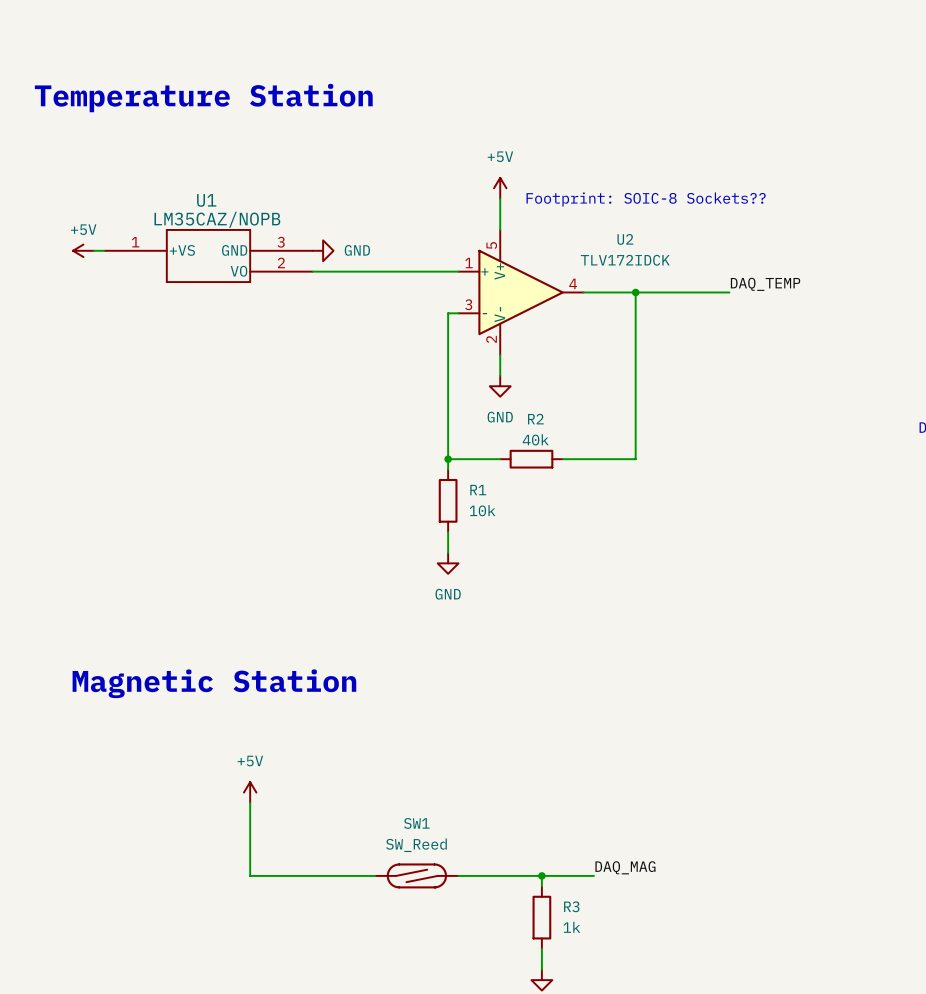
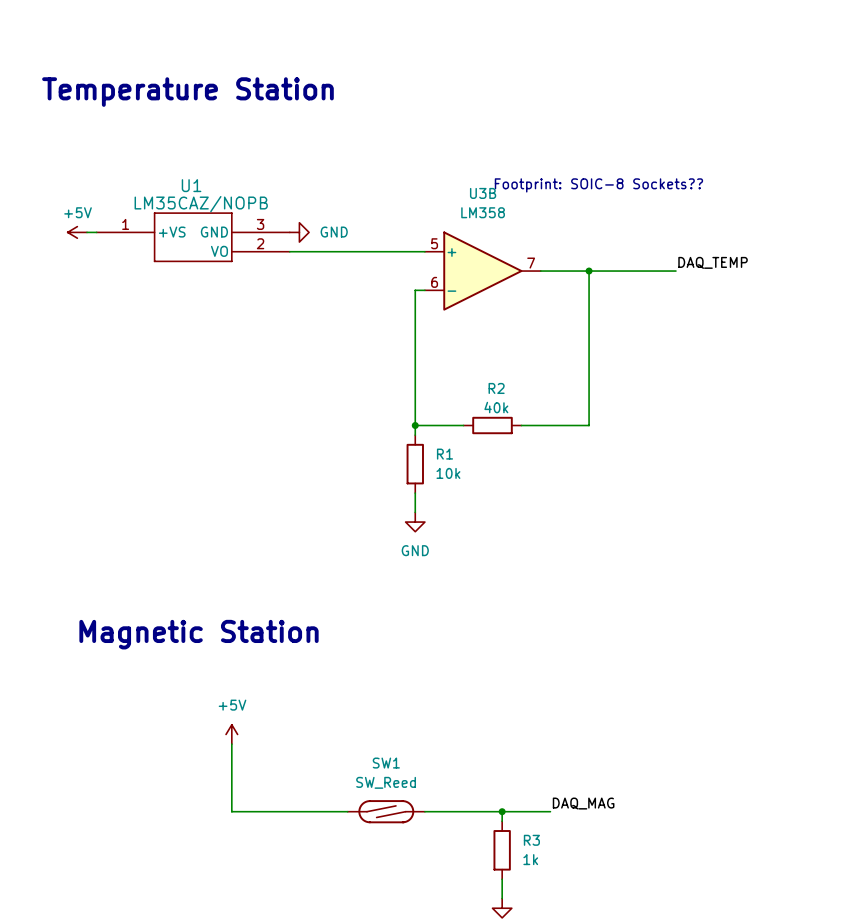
power symbol: +5V (500, 188) -> none
wire: (500, 198) (500, 229) -> none
U2: TLV172IDCK (521, 292) -> none
U3B: none -> LM358 (482, 271)
wire: (500, 354) (500, 375) -> none
power symbol: GND (500, 386) -> none

